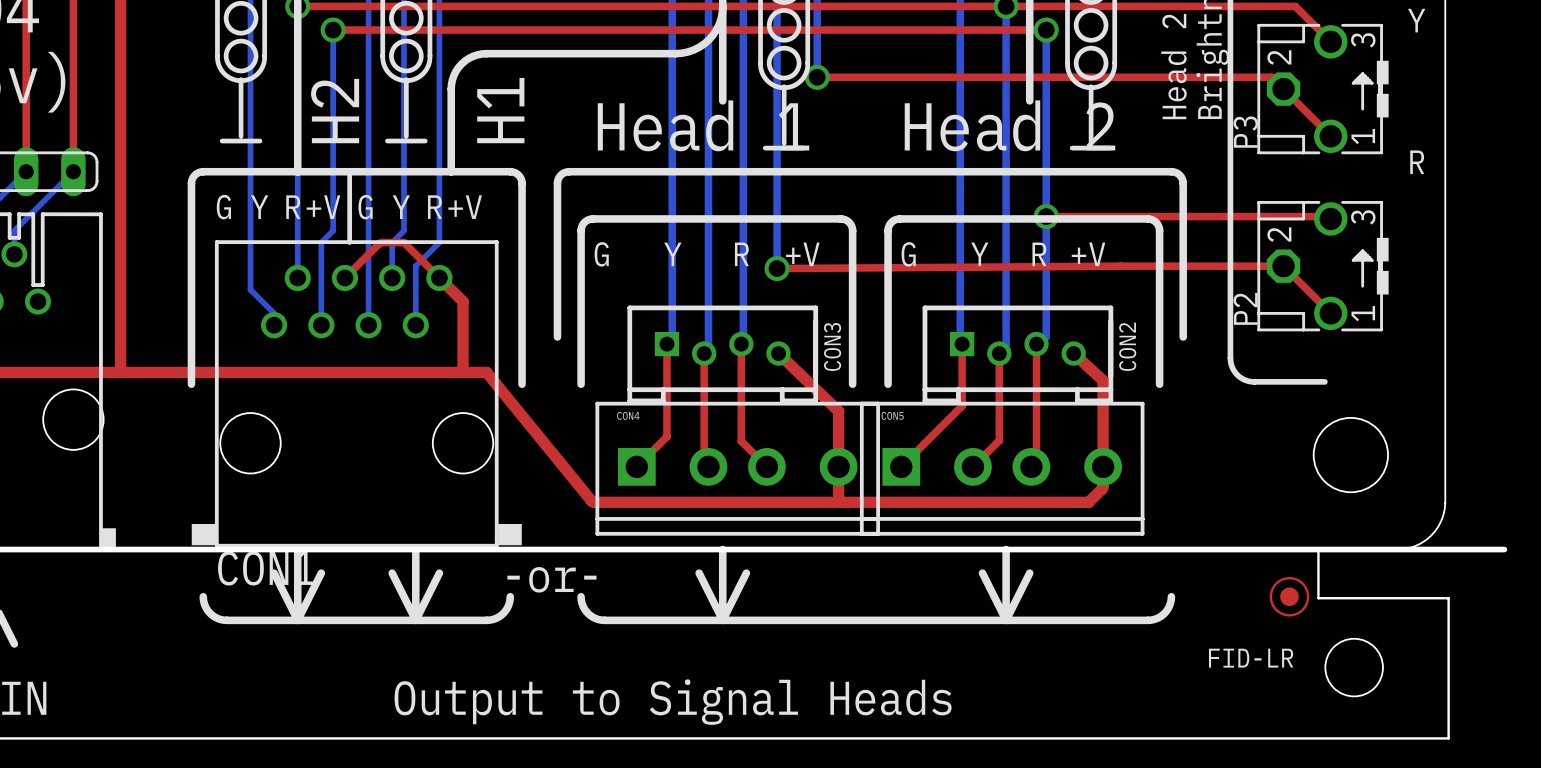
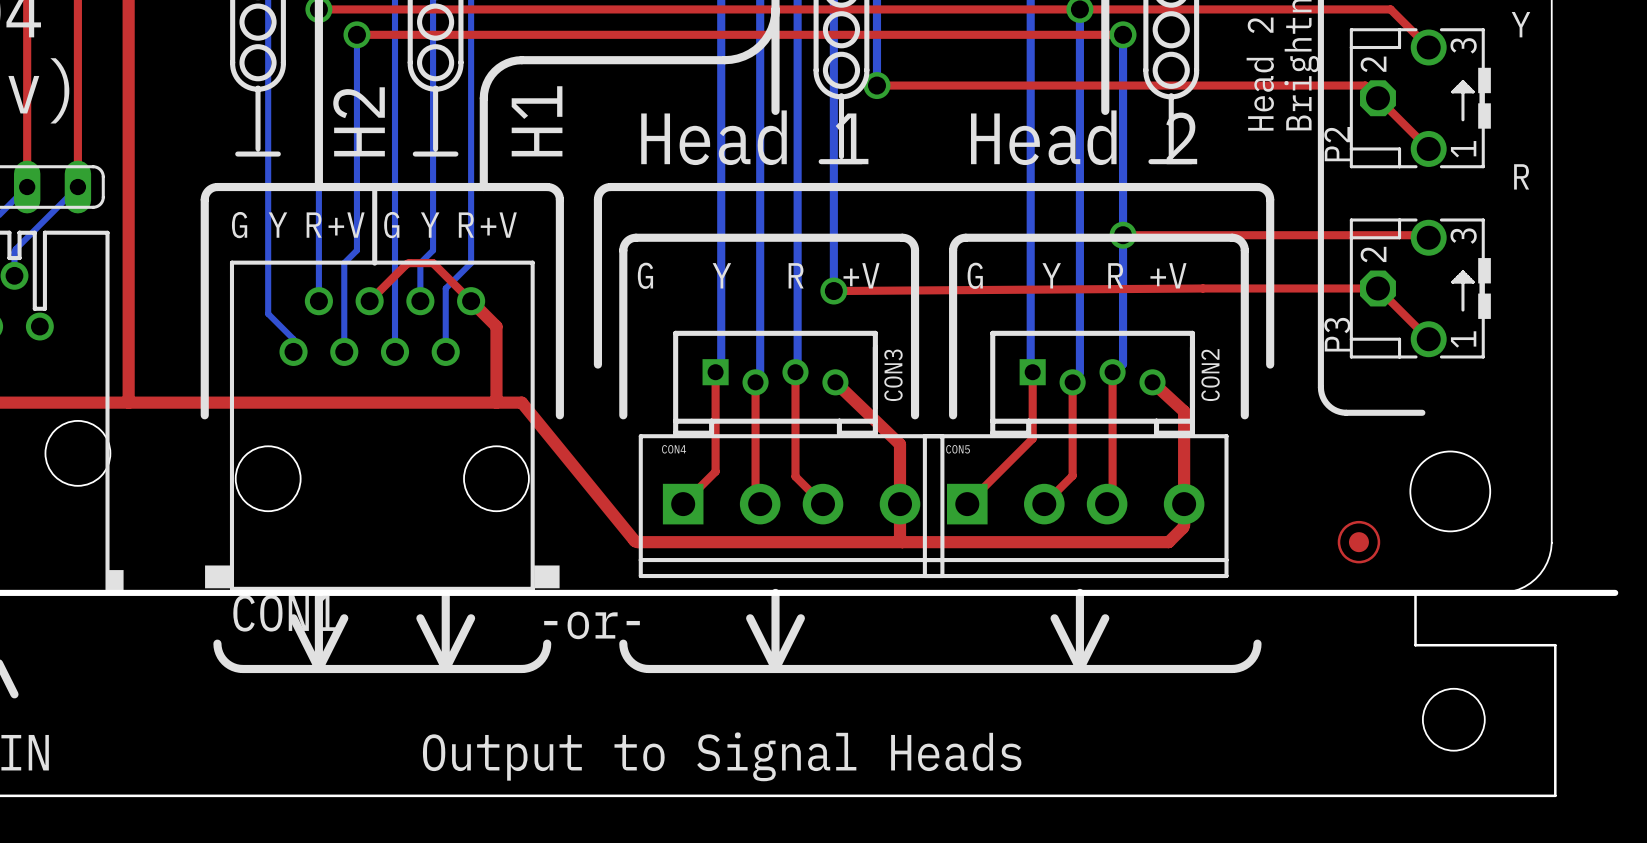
P3 name: P3 (1245, 132) -> P2 (1337, 144)
P2 name: P2 (1245, 308) -> P3 (1337, 334)
part: none -> (1358, 542)
FID-LR: (1289, 596) -> none

